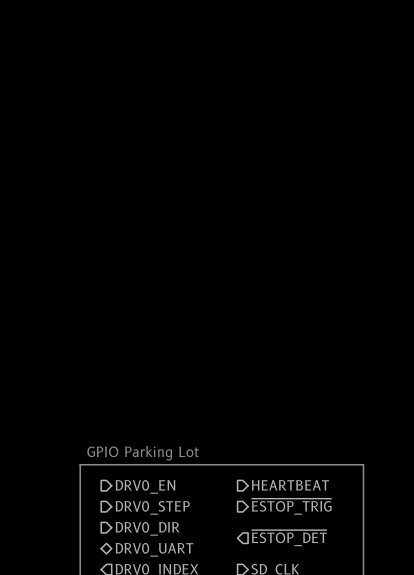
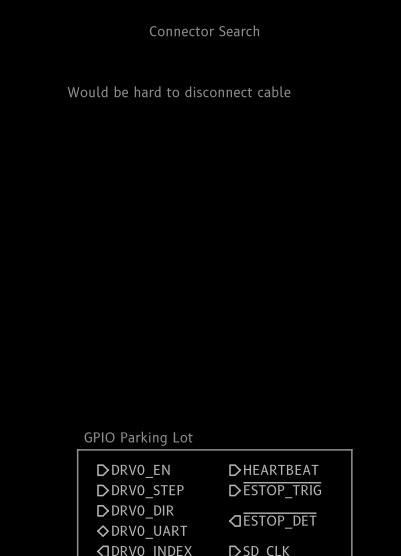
text: none -> Connector Search (204, 30)
text: none -> Would be hard to disconnect cable (179, 91)

